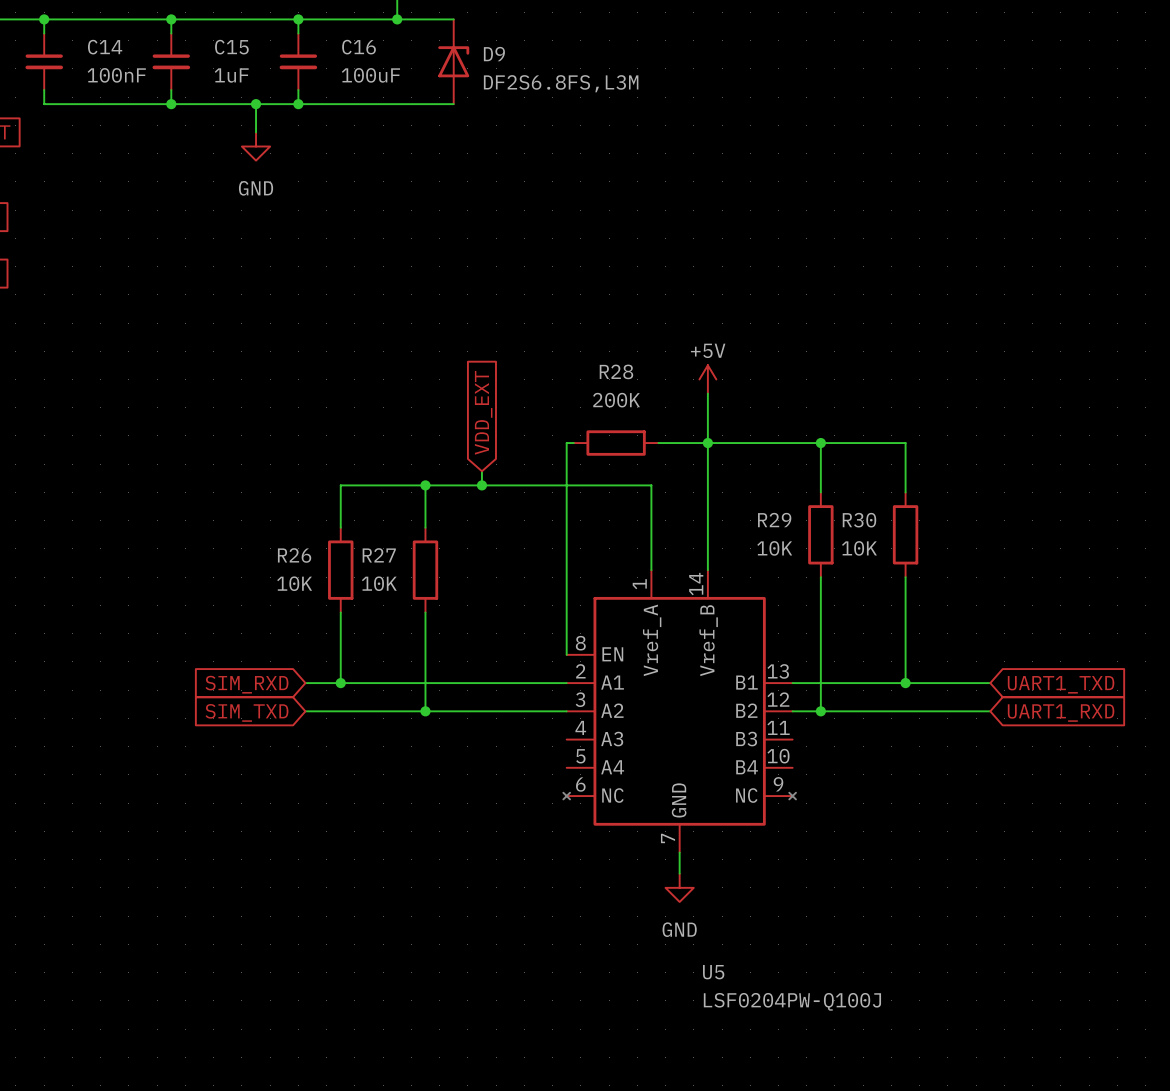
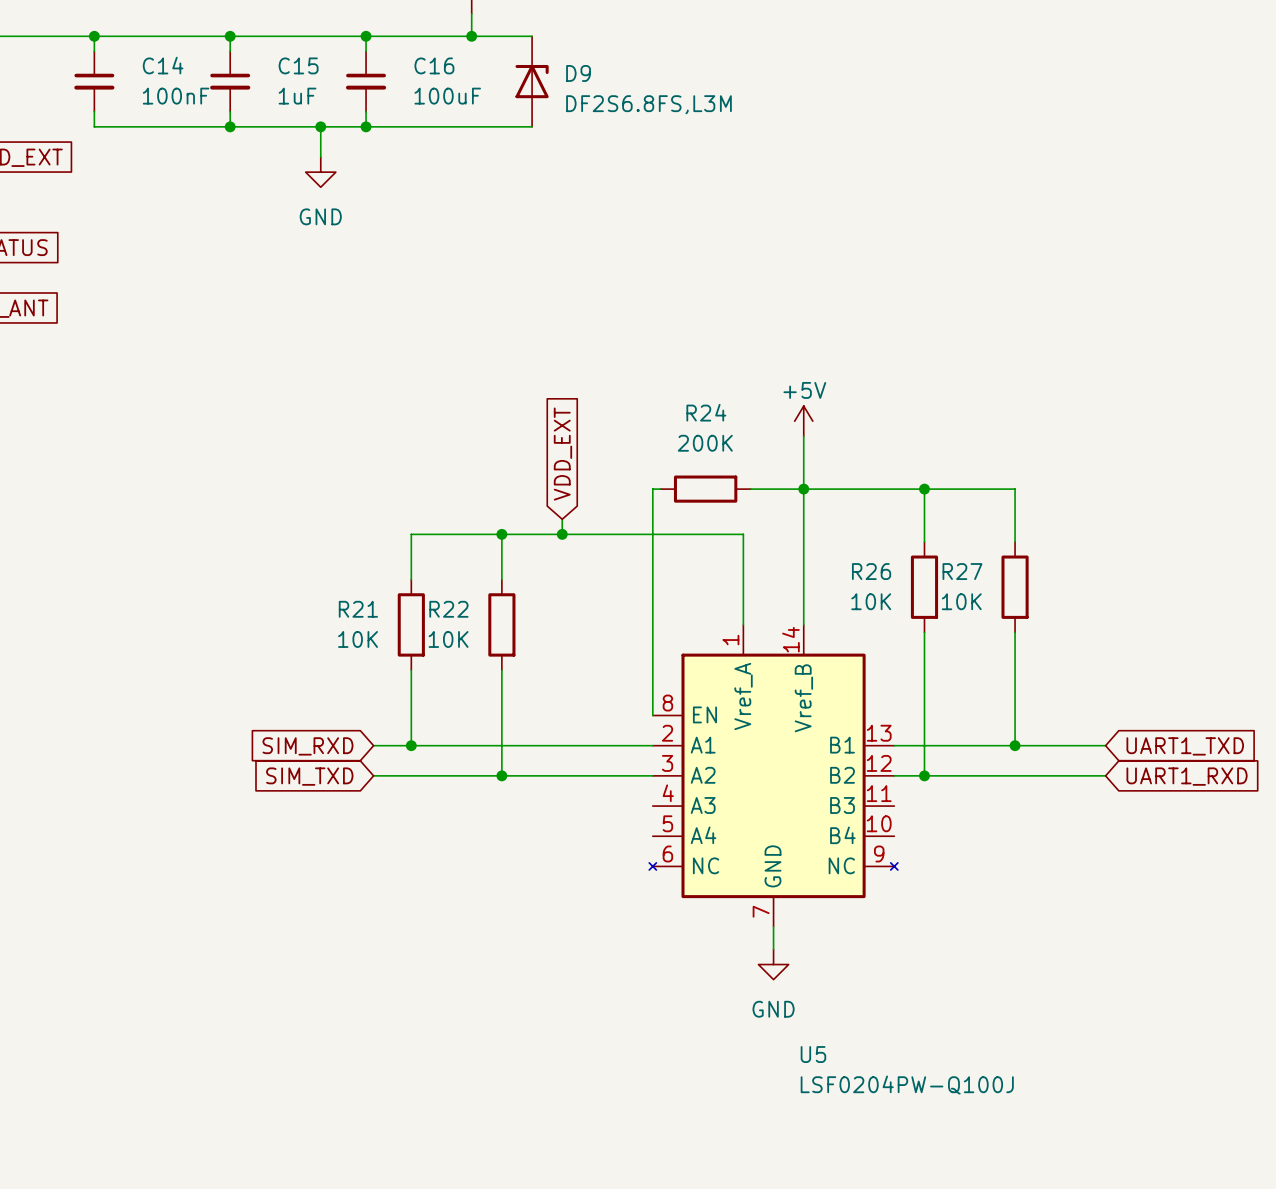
R28 name: R28 (616, 371) -> R24 (706, 412)
R29 name: R29 (774, 520) -> R26 (871, 571)
R30 name: R30 (859, 520) -> R27 (962, 571)
R26 name: R26 (294, 555) -> R21 (358, 609)
R27 name: R27 (379, 555) -> R22 (448, 609)

